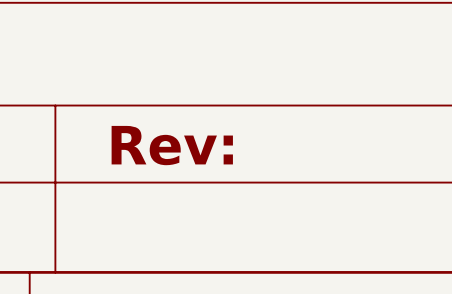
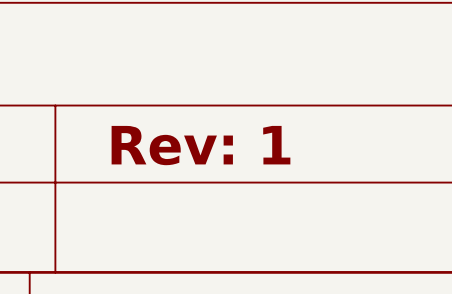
title block: Rev: (172, 145) -> Rev: 1 (200, 145)

